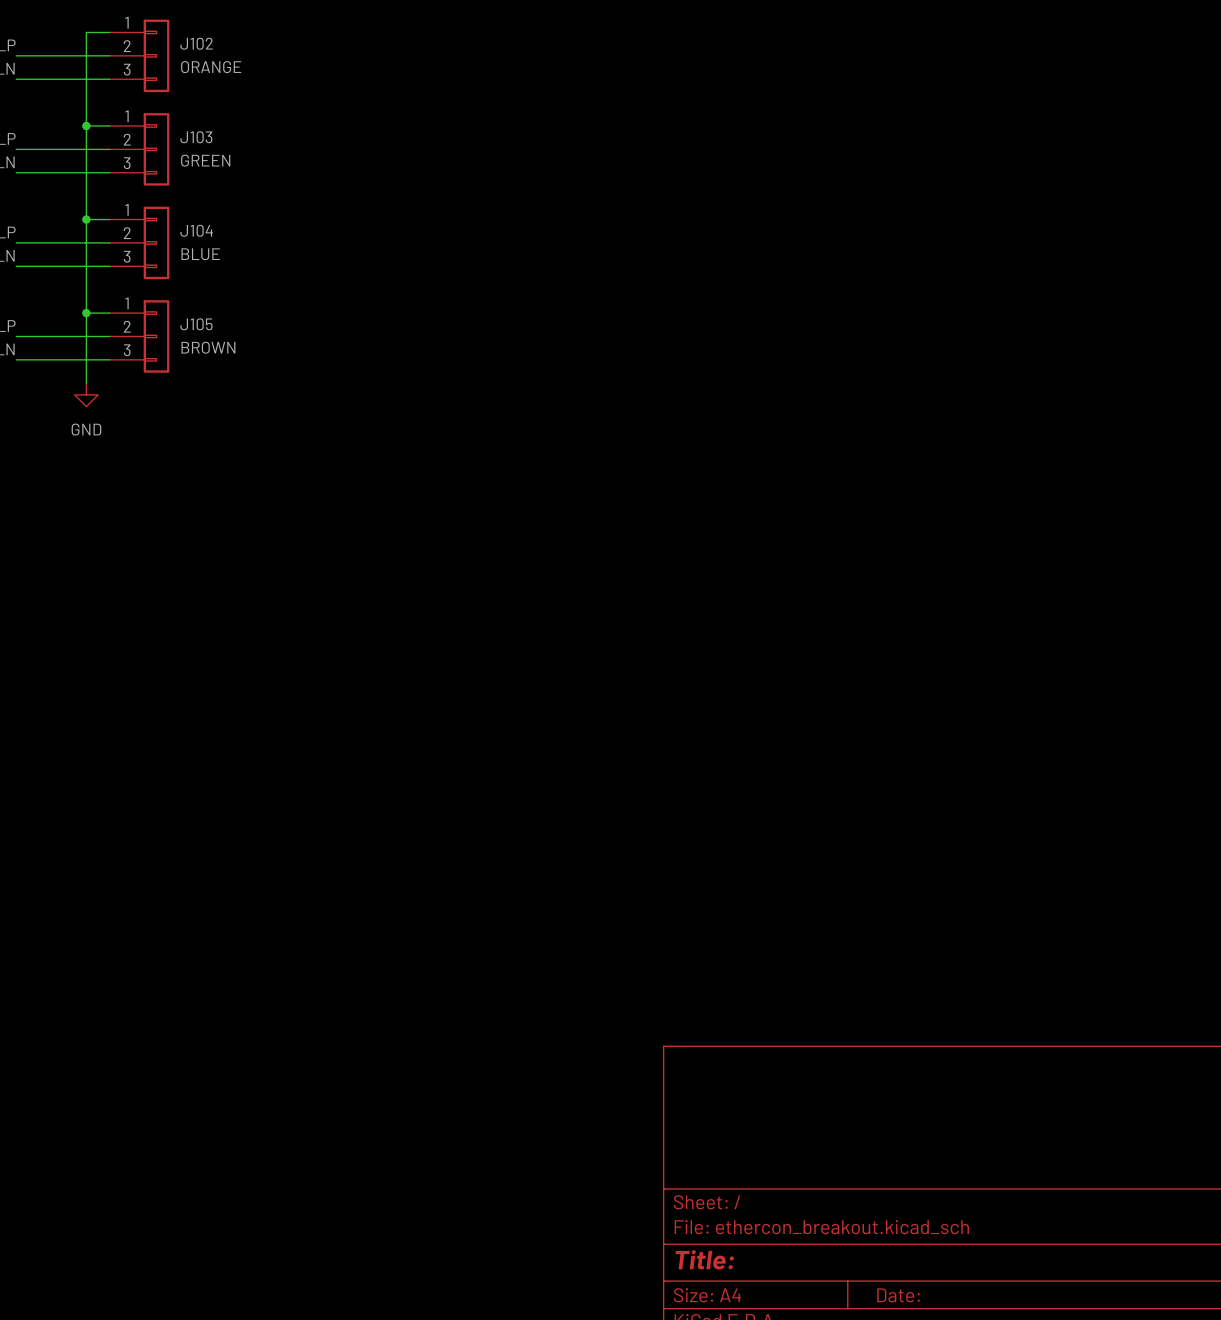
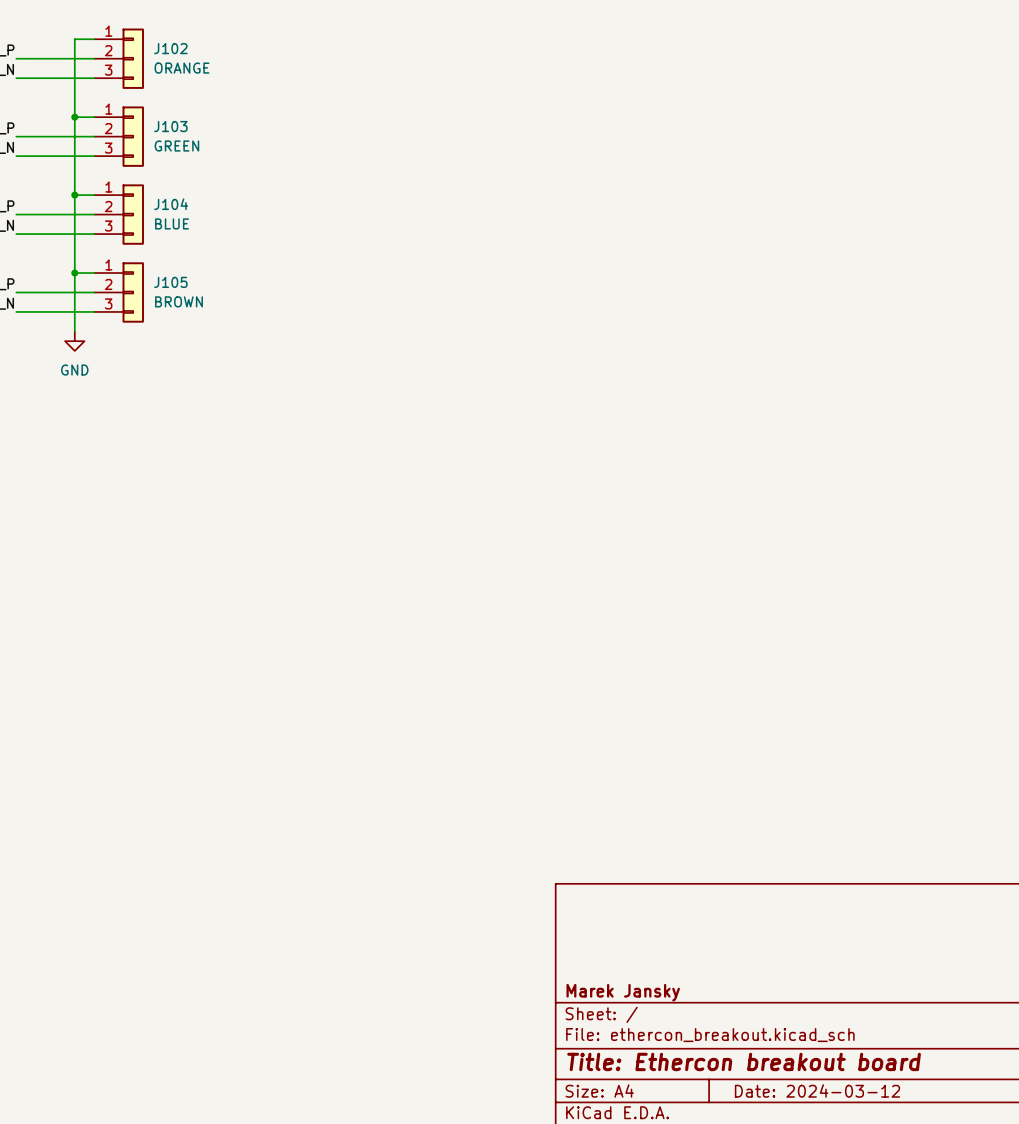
title block: none -> Marek Jansky (623, 992)
title block: Title: (704, 1259) -> Title: Ethercon breakout board (744, 1061)
title block: Date: (898, 1295) -> Date: 2024-03-12 (817, 1090)

